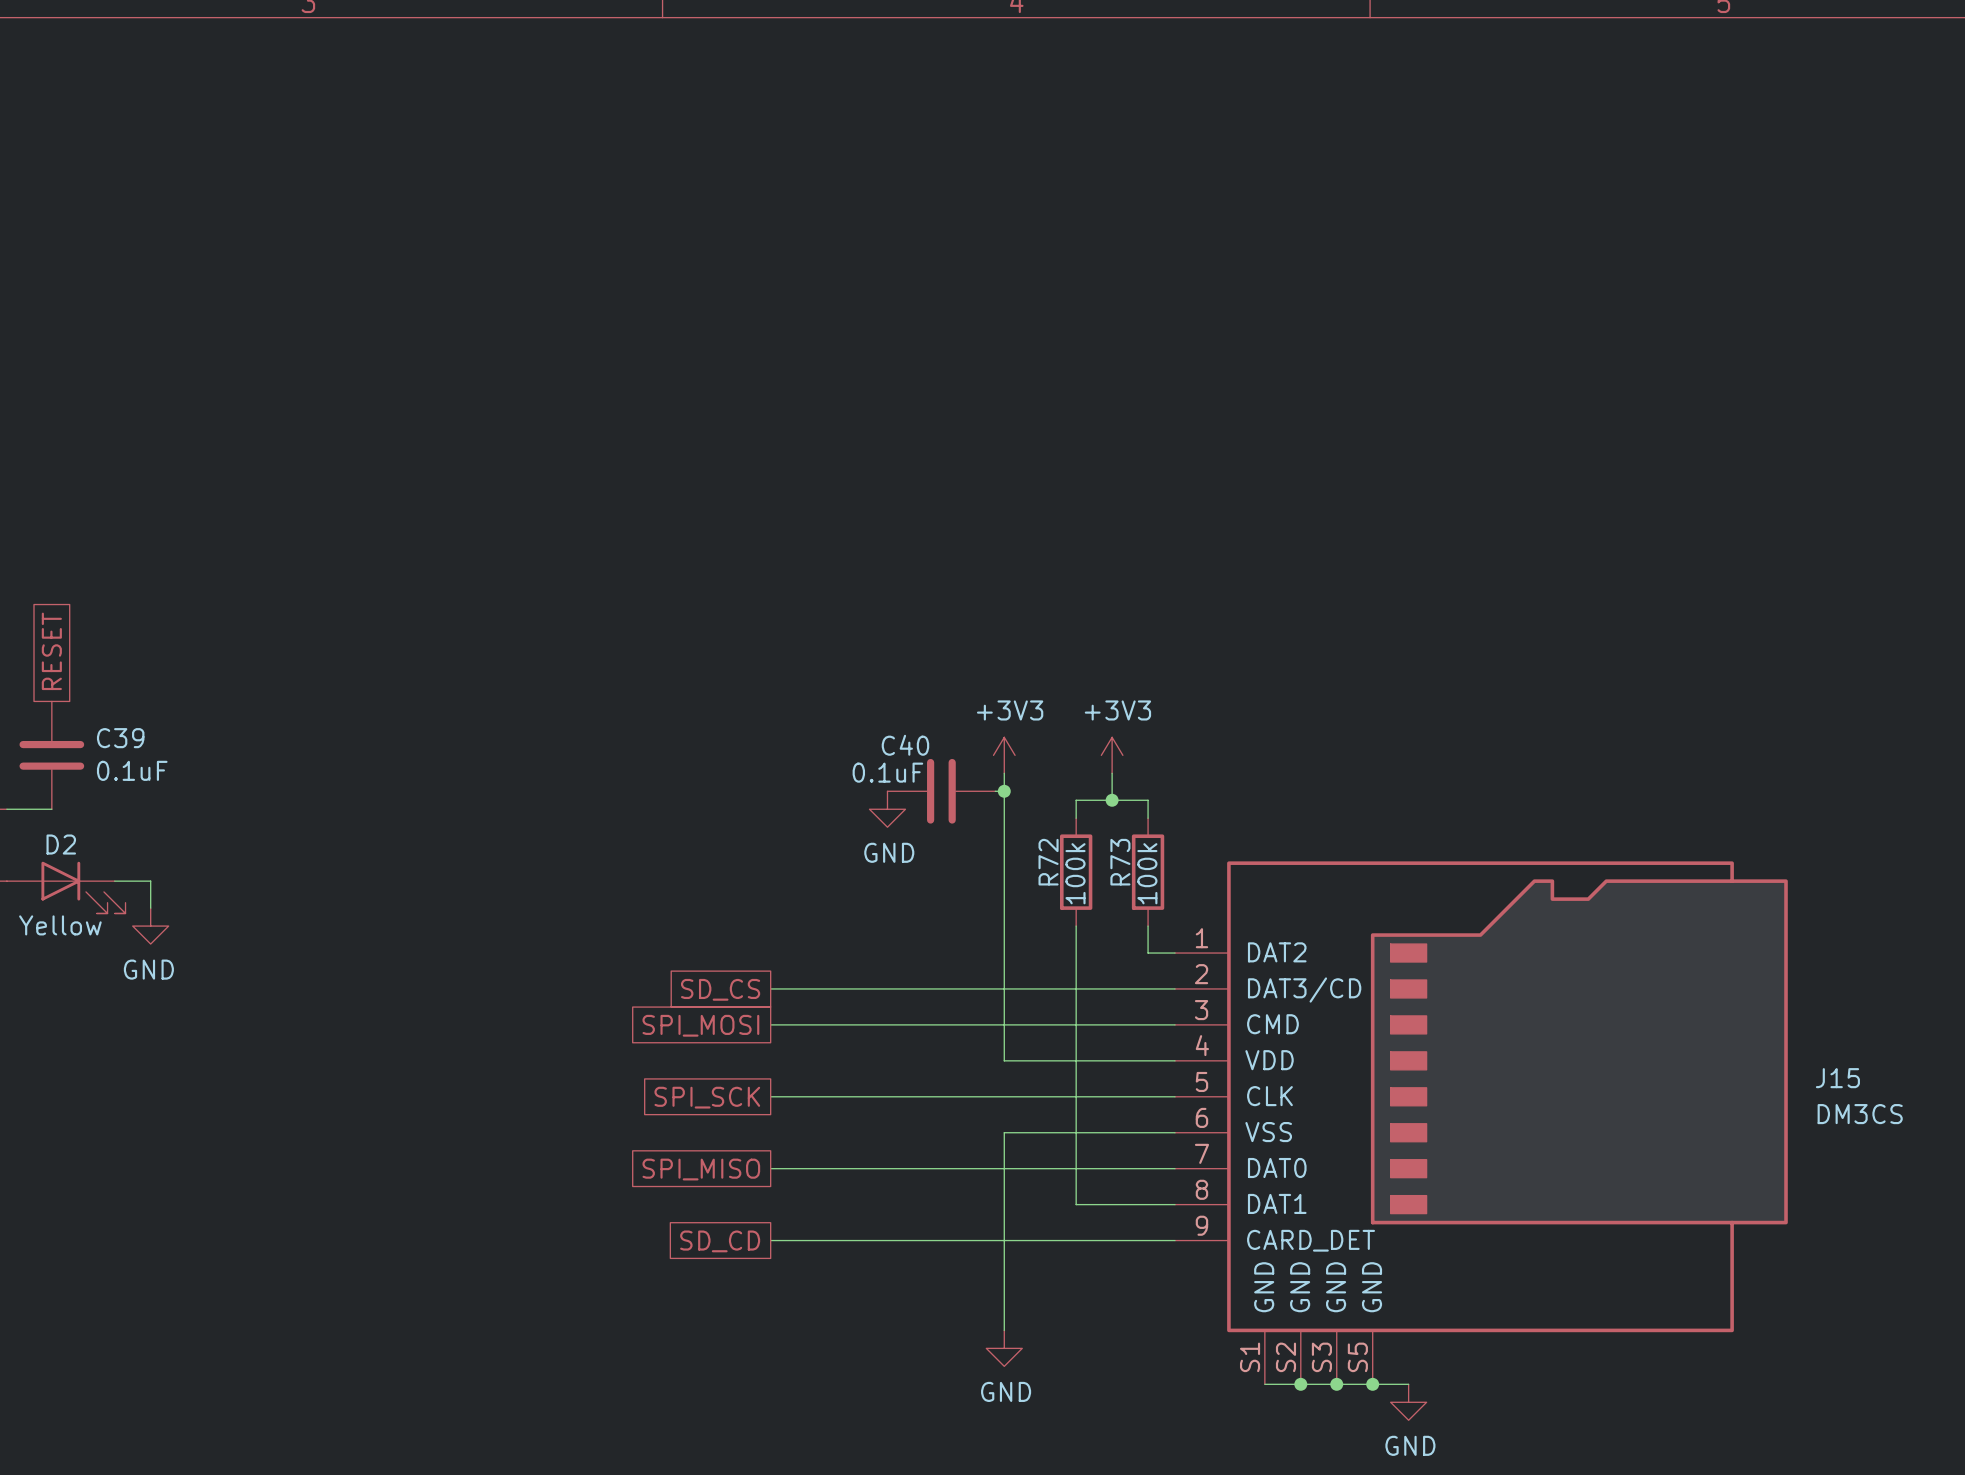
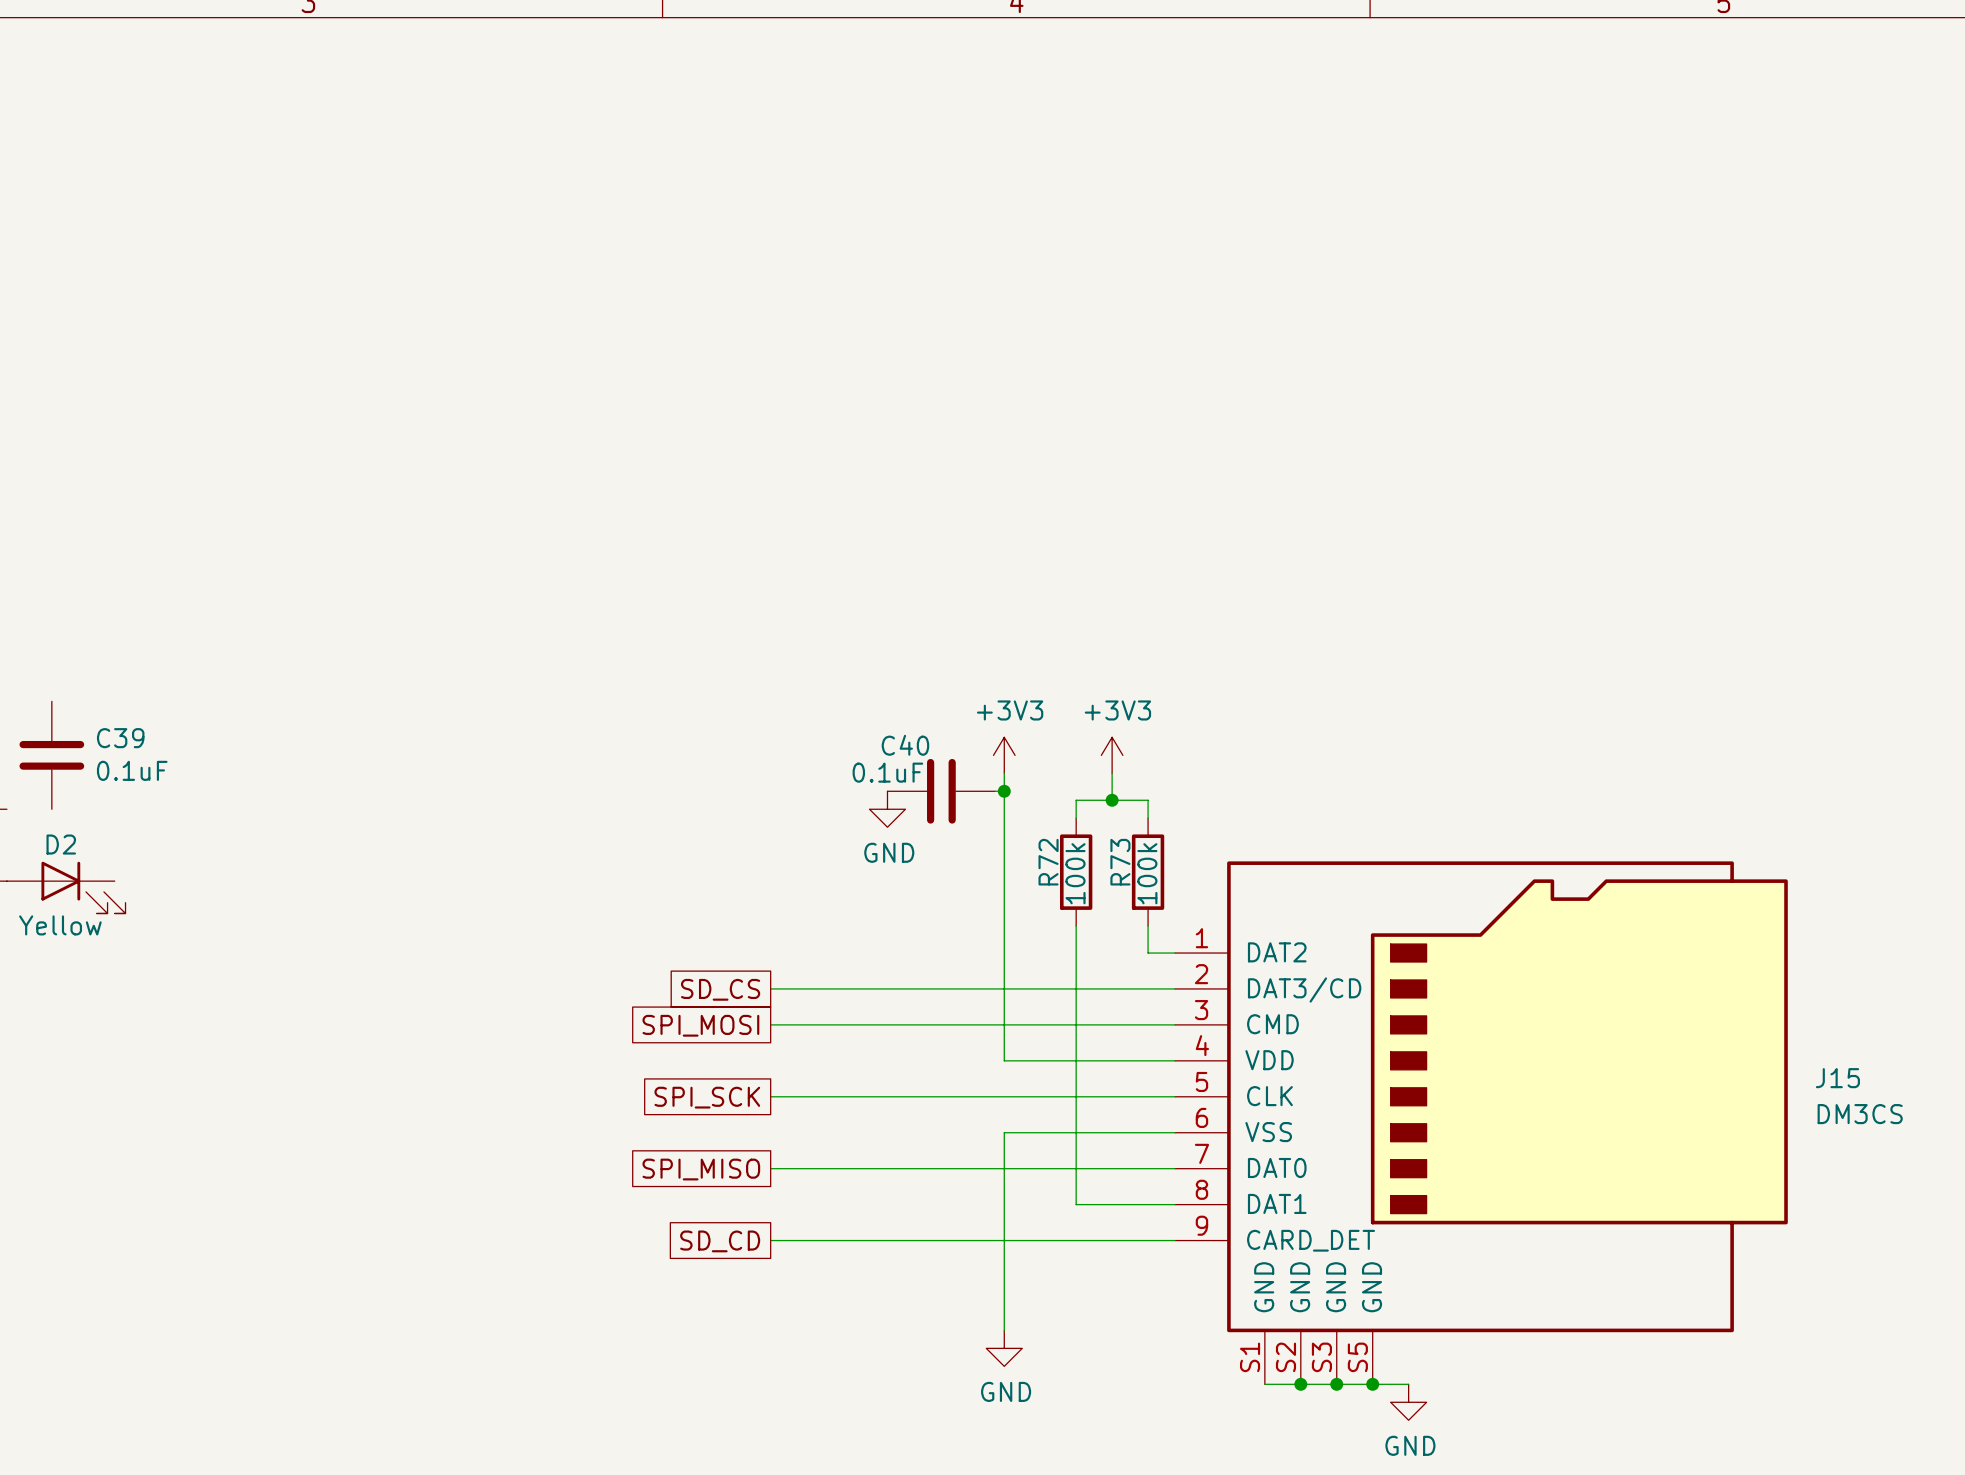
global label: RESET (51, 651) -> none
wire: (6, 809) (51, 809) -> none
wire: (114, 881) (150, 881) (150, 908) -> none
power symbol: GND (150, 926) -> none

